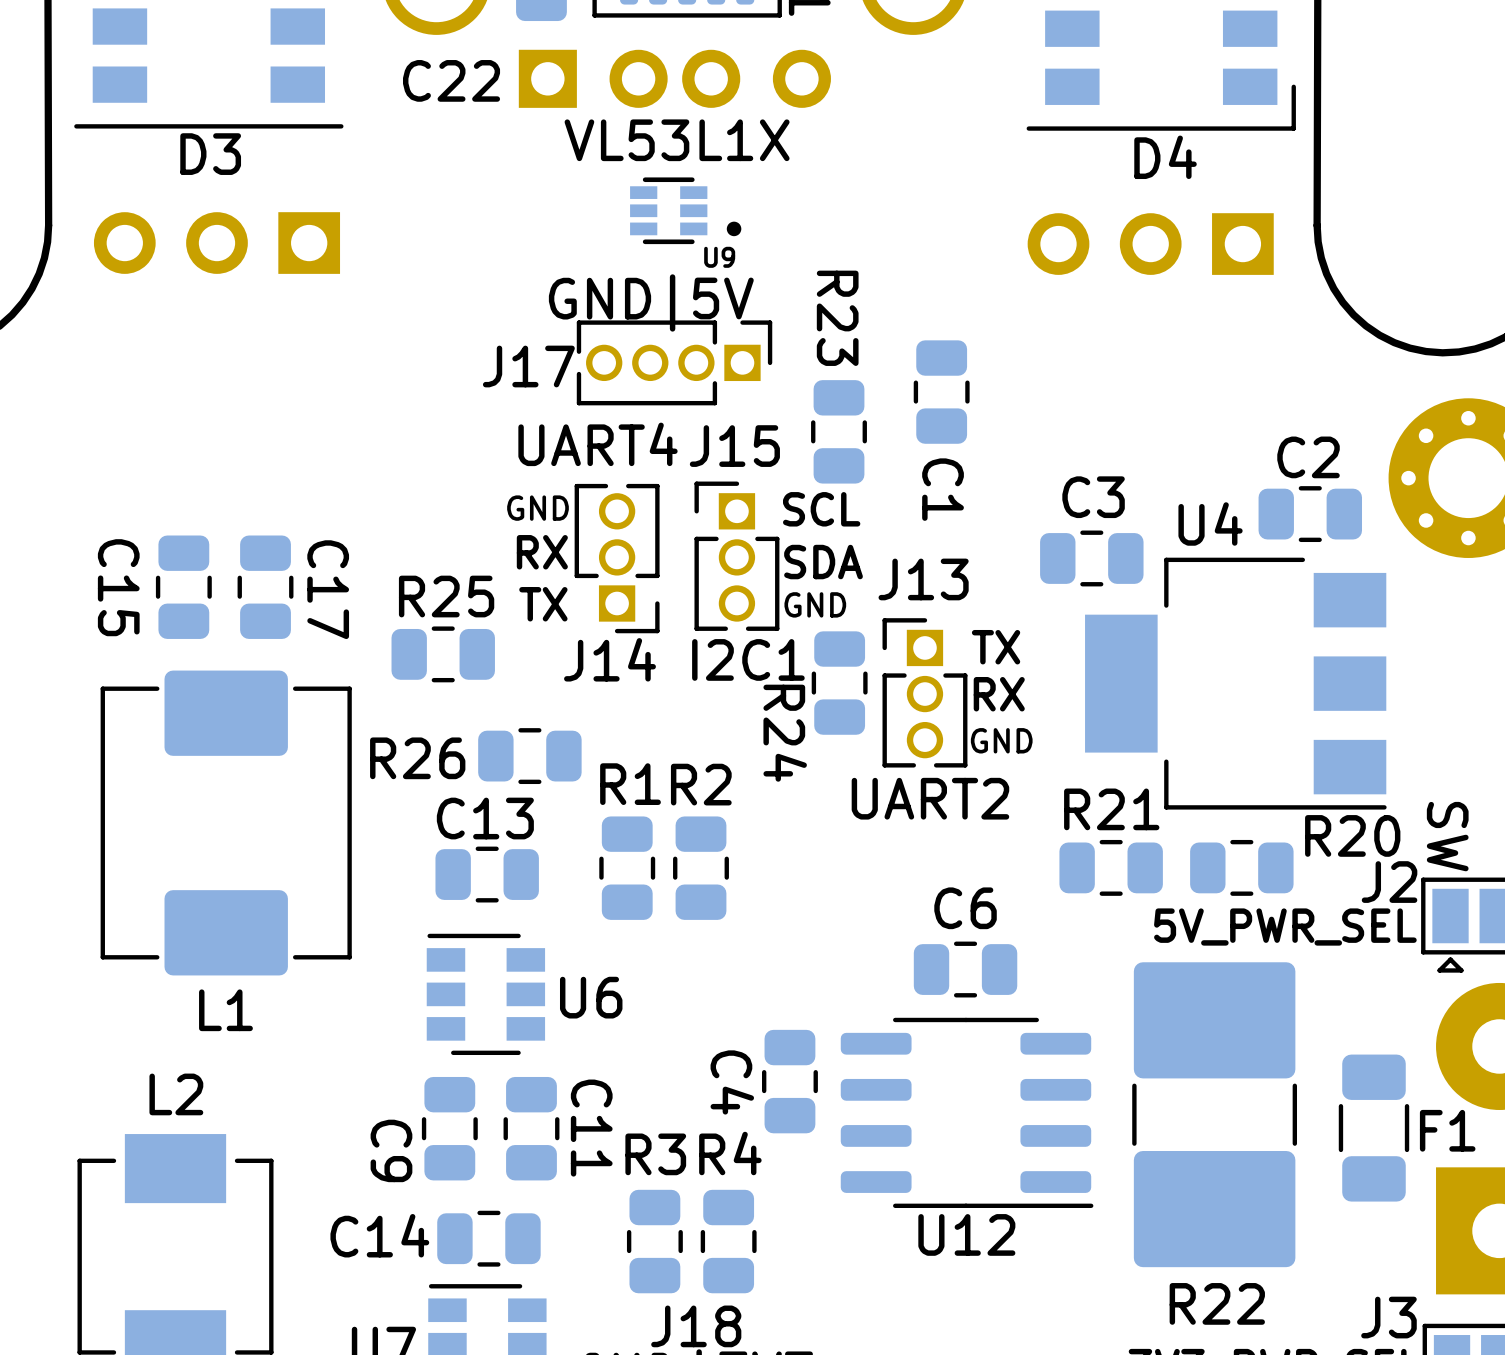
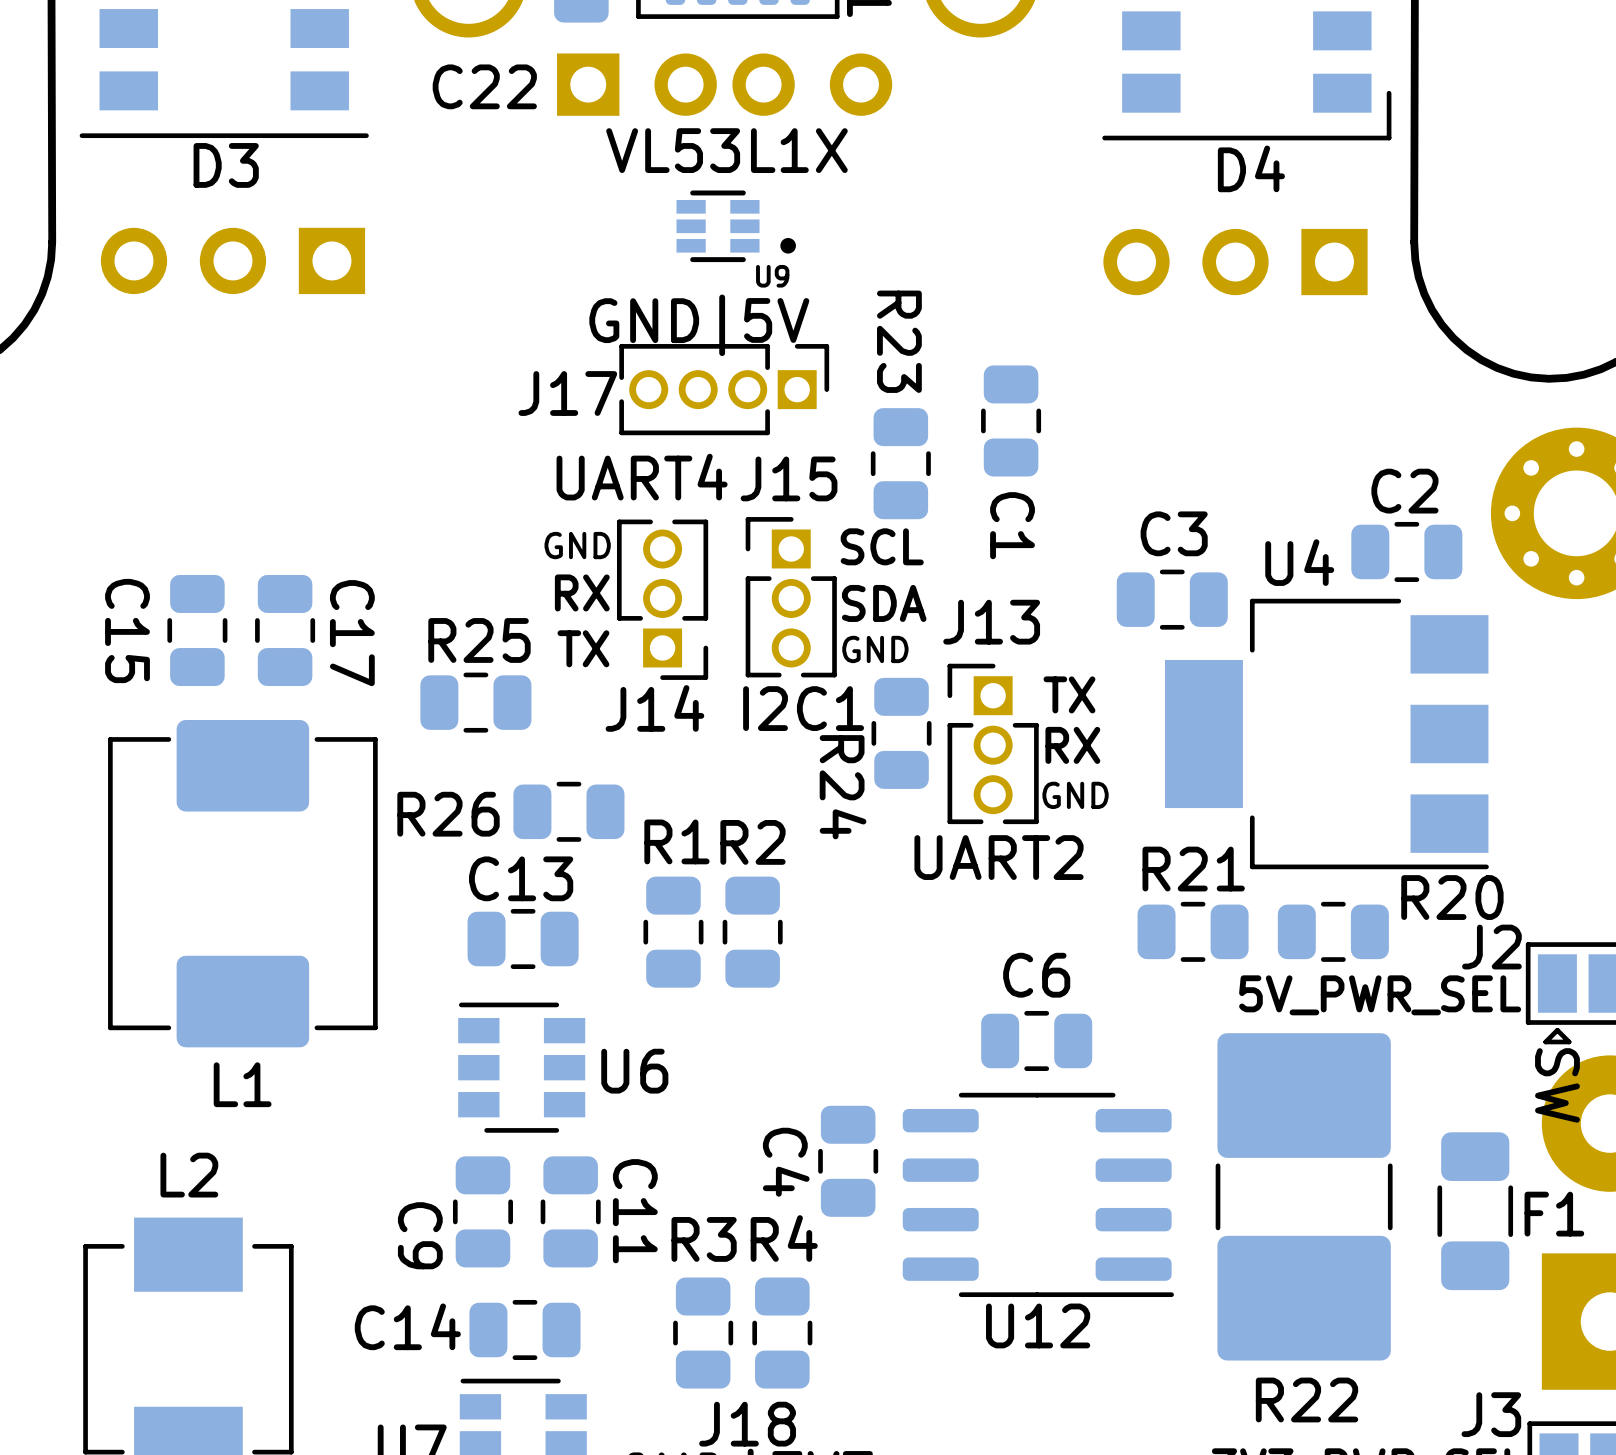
text position: SW (1447, 836) -> SW (1557, 1085)

